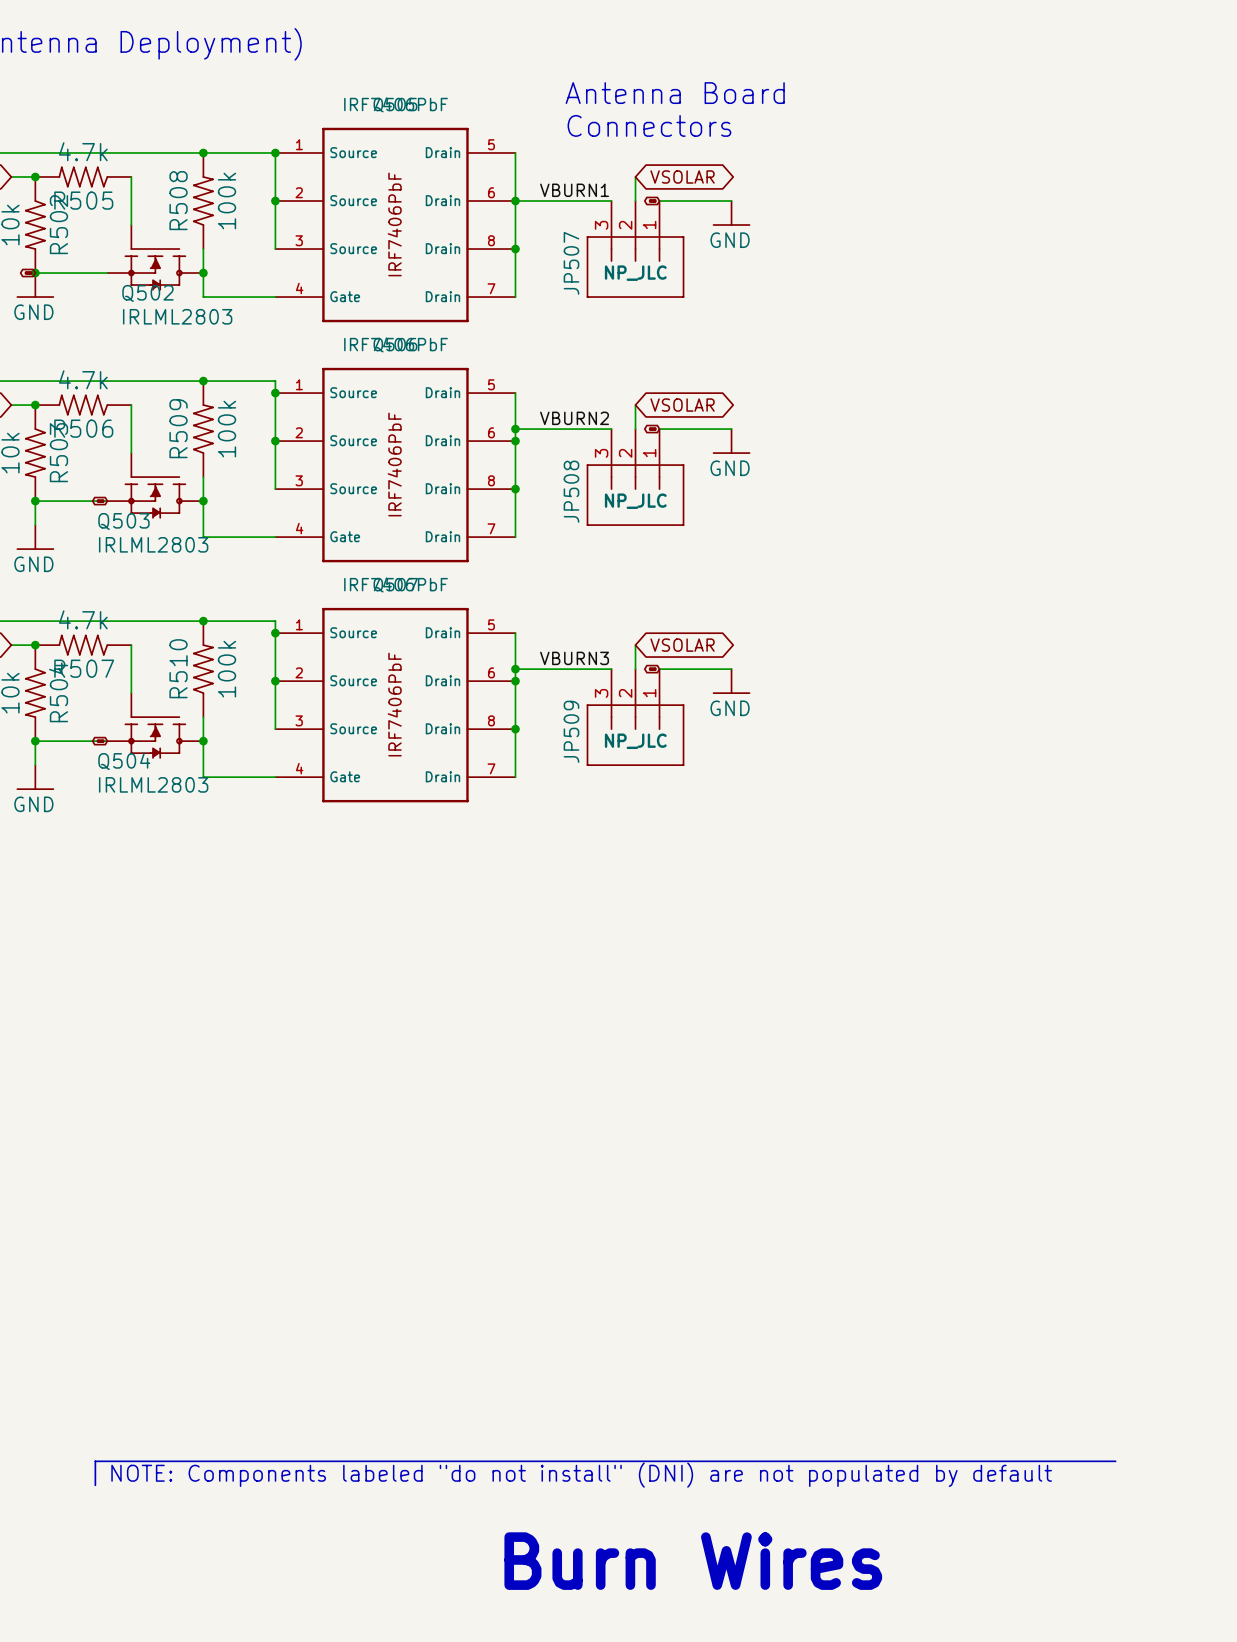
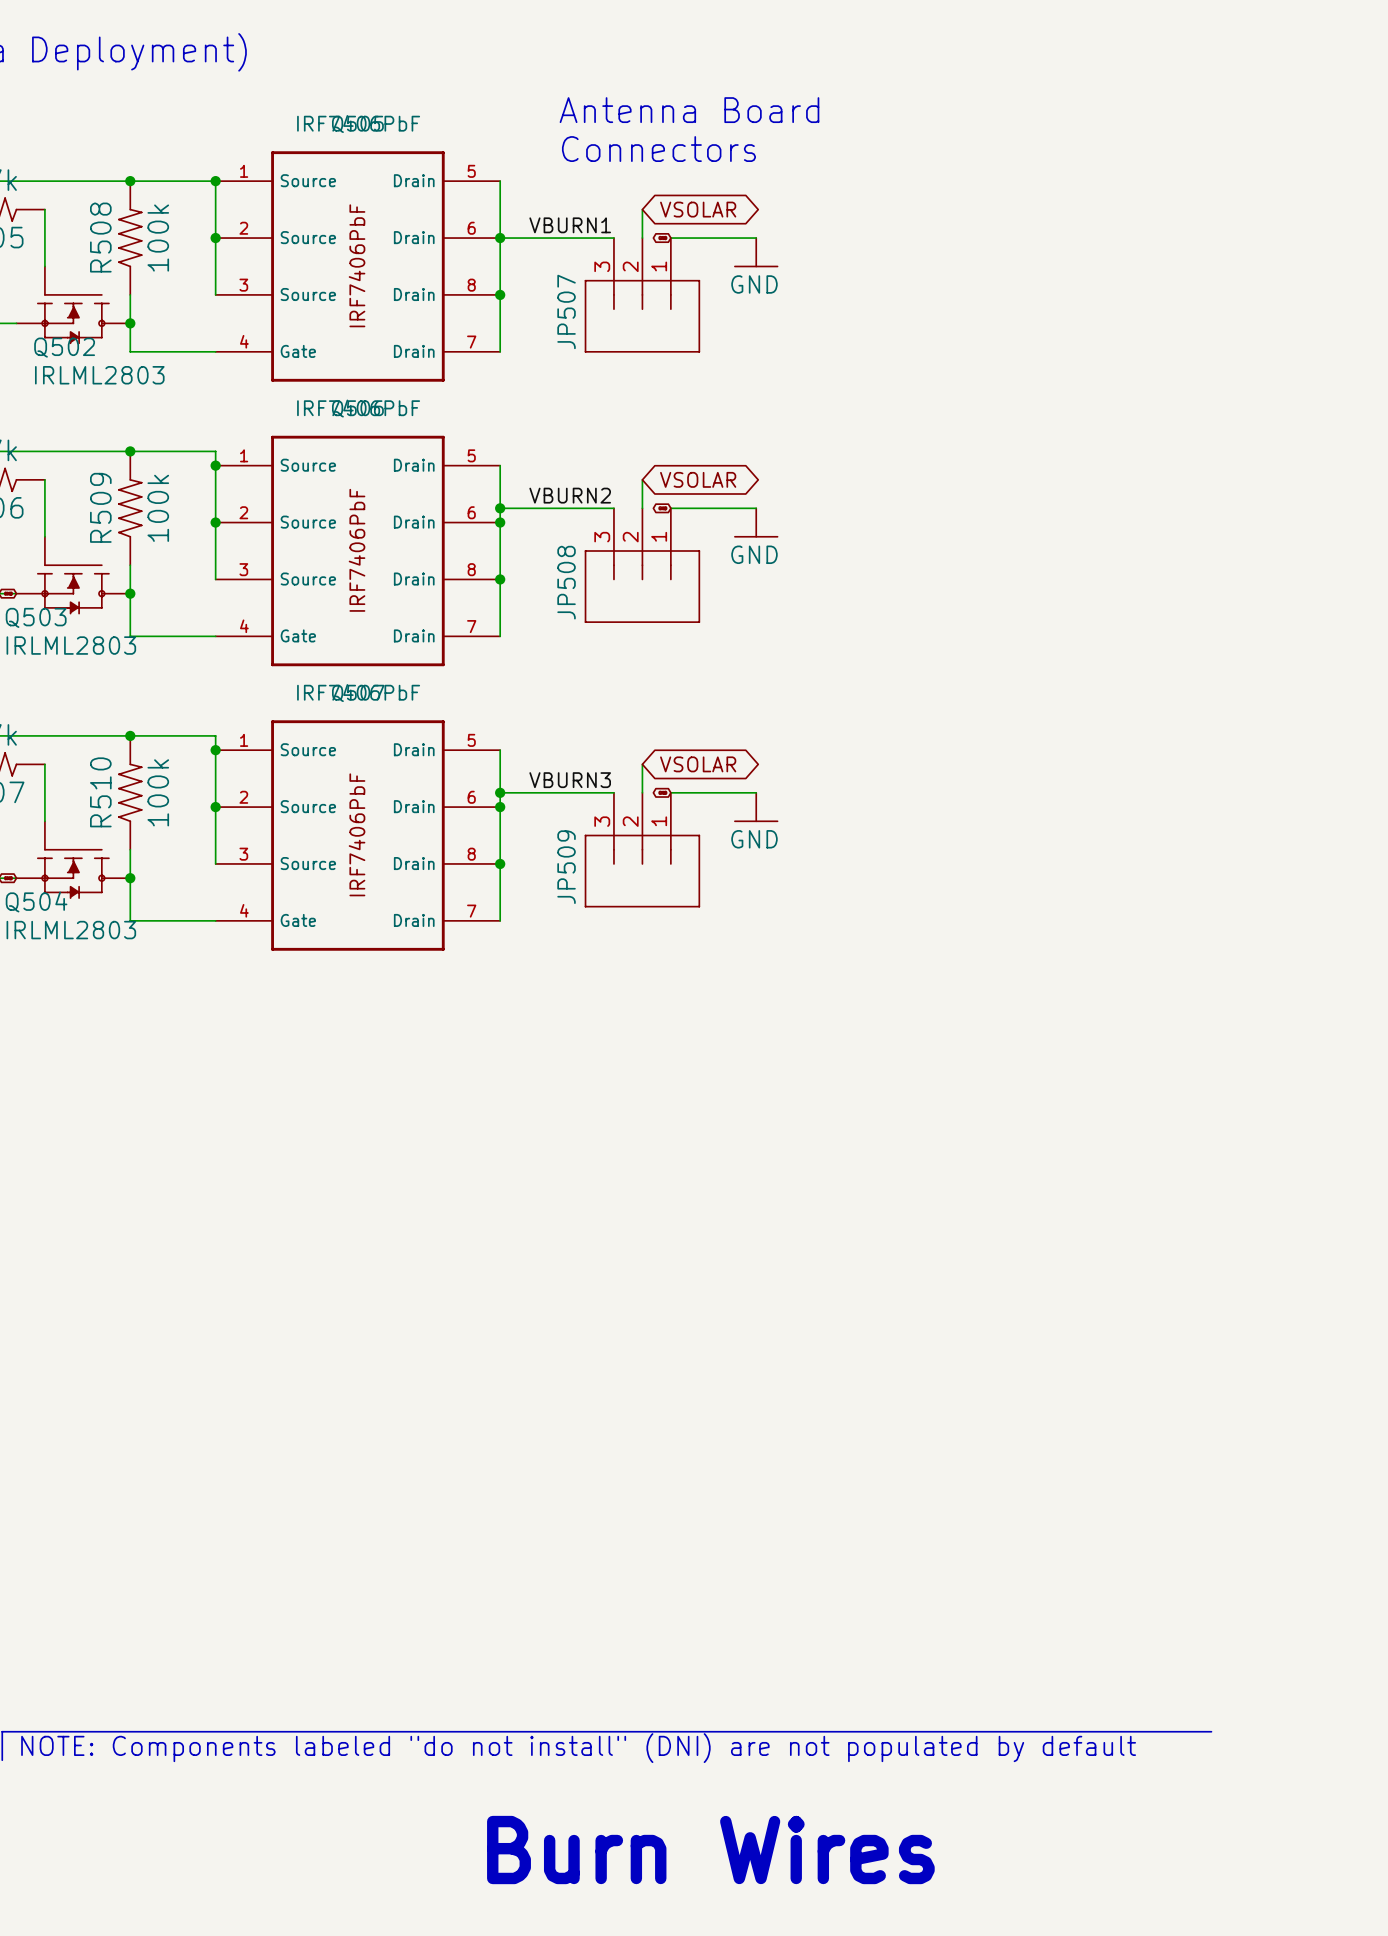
JP507 text: NP_JLC (635, 273) -> none
JP508 text: NP_JLC (635, 501) -> none
JP509 text: NP_JLC (635, 741) -> none

